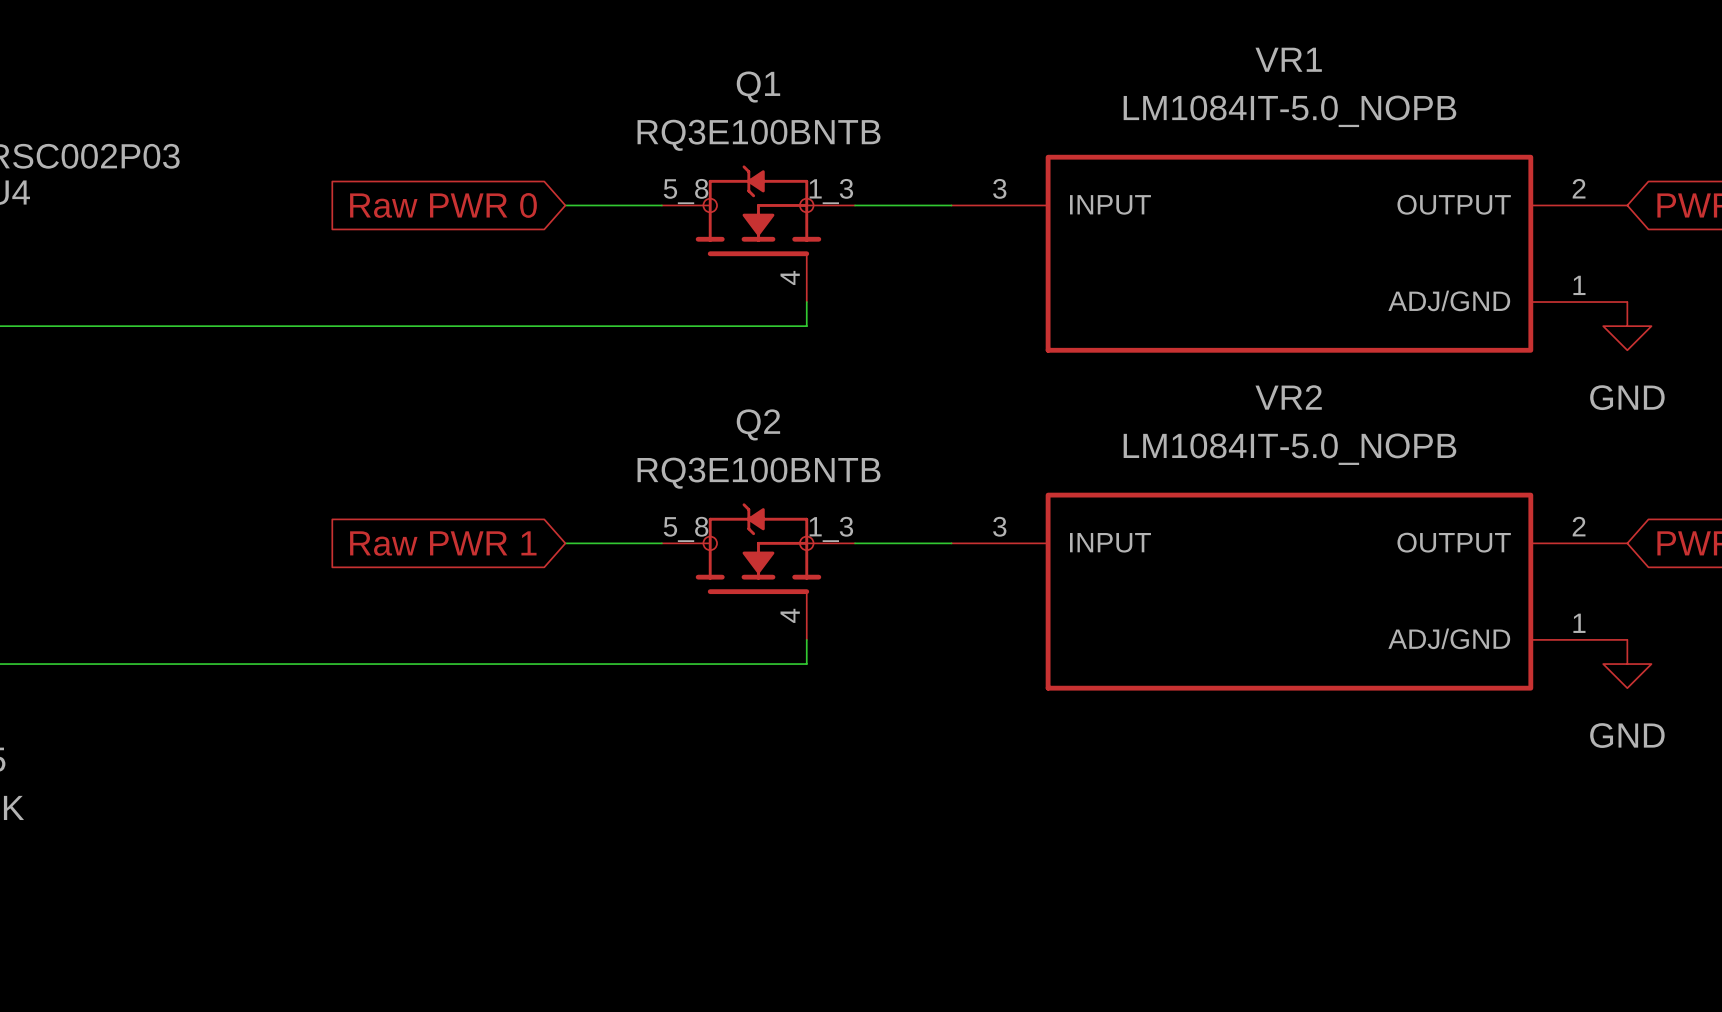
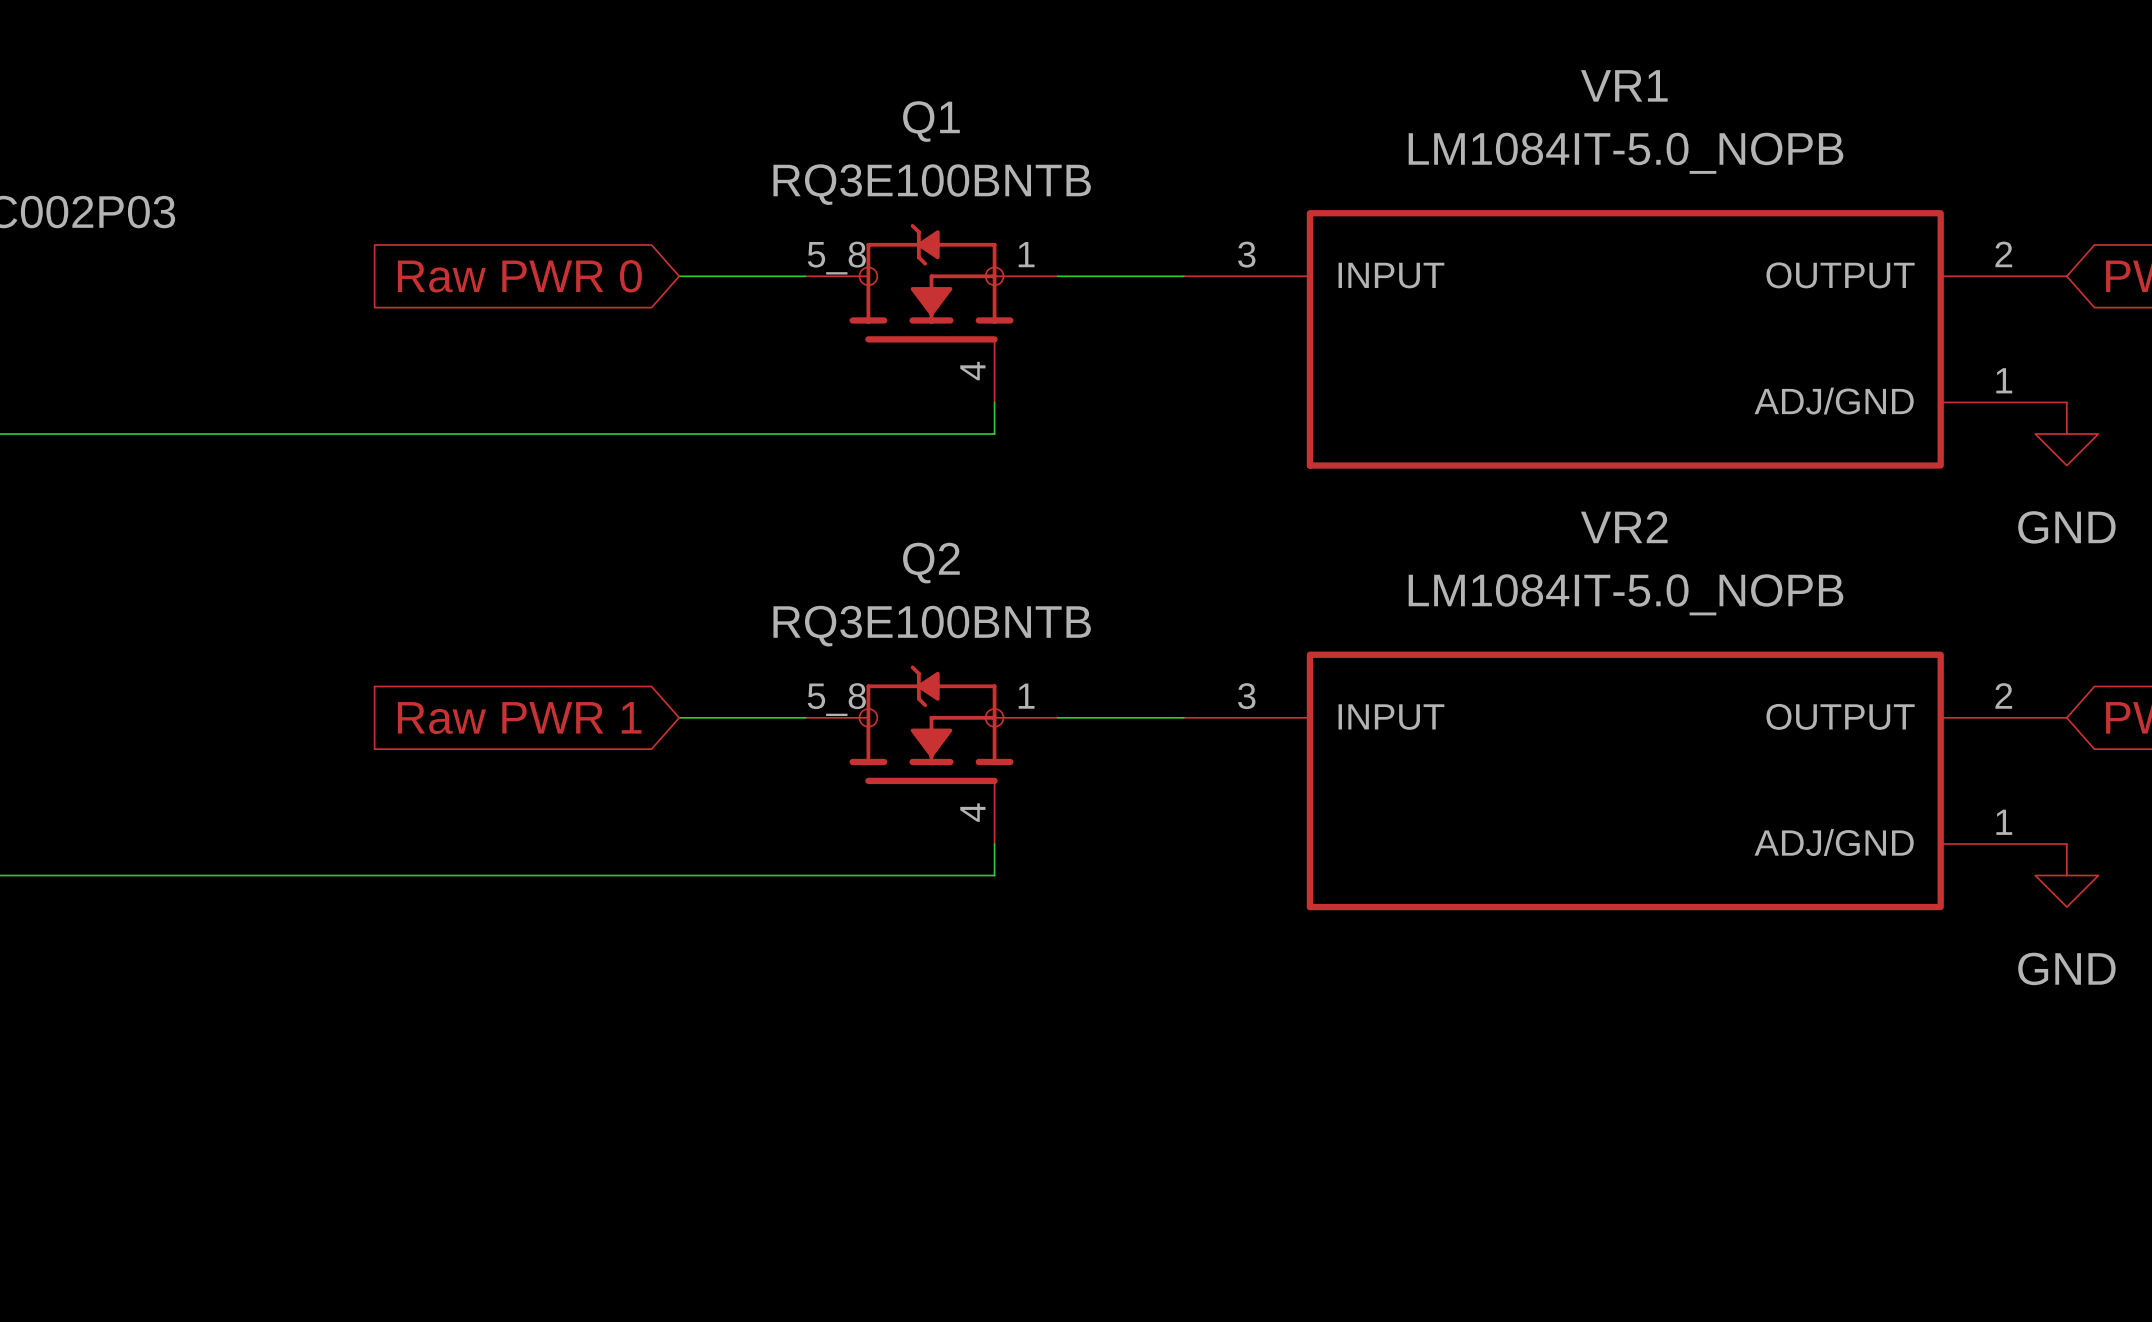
Q1 pin number: 1_3 (831, 191) -> 1 (1026, 254)
Q2 pin number: 1_3 (831, 529) -> 1 (1026, 696)

